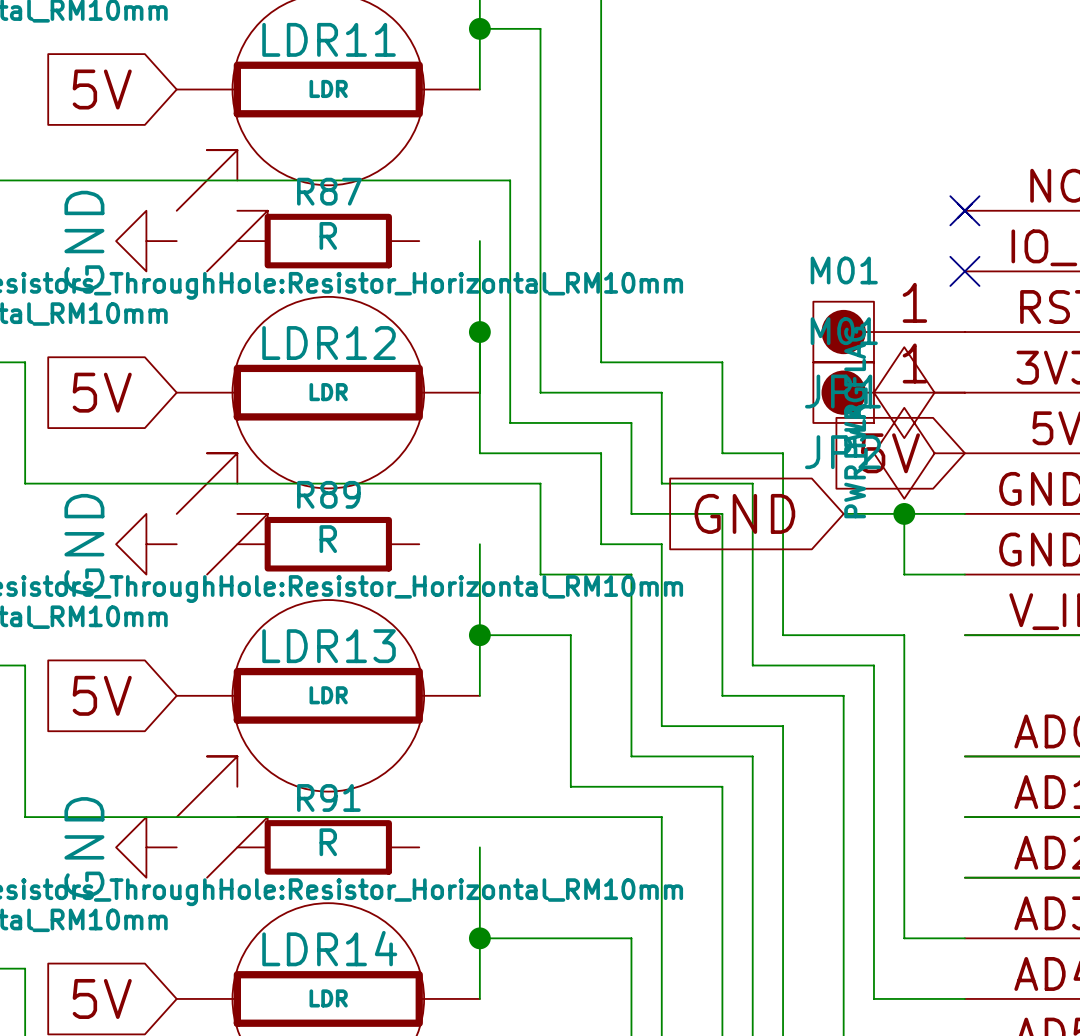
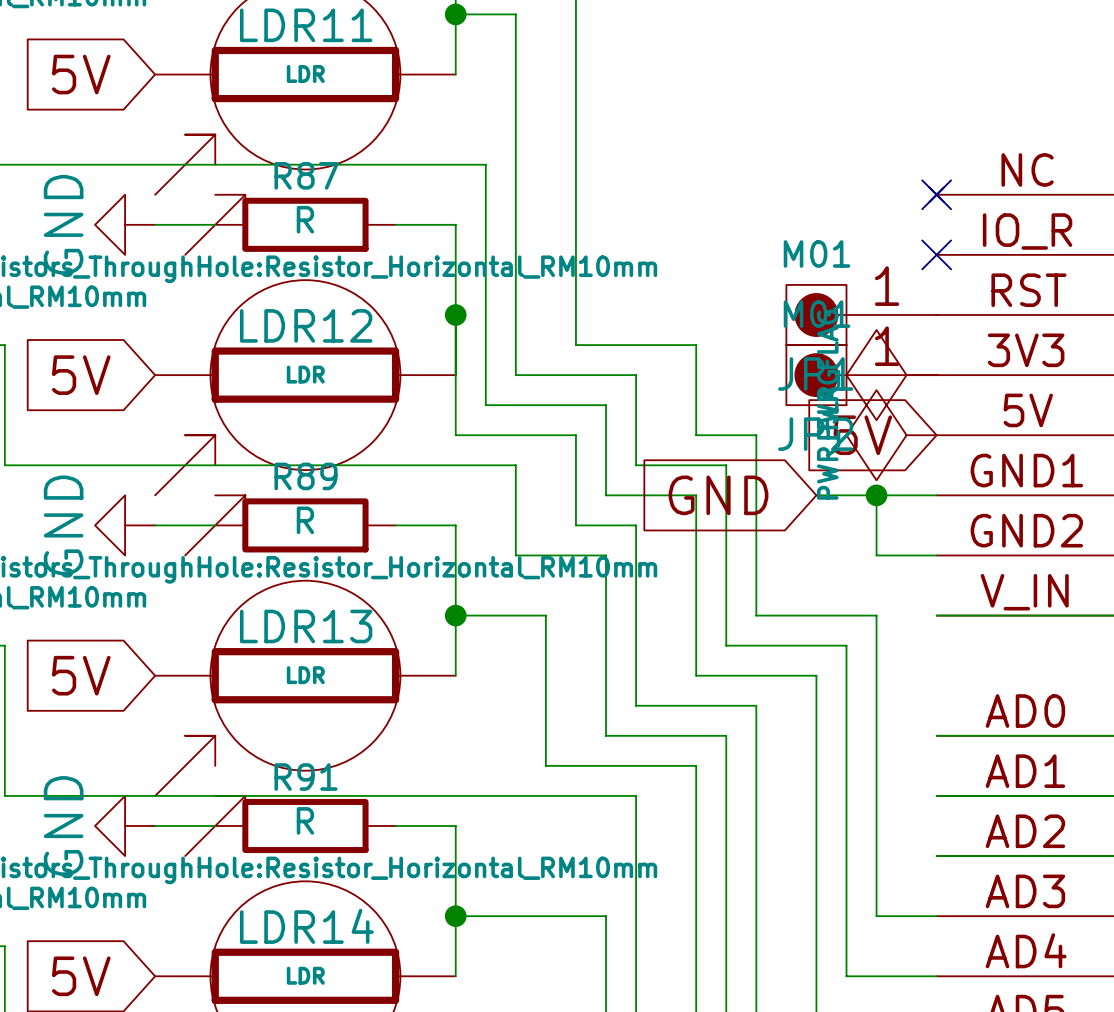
wire: none -> (155, 224) (215, 224)
wire: none -> (395, 224) (455, 224)
wire: none -> (155, 525) (215, 525)
wire: none -> (395, 525) (455, 525)
wire: none -> (155, 826) (215, 826)
wire: none -> (395, 826) (455, 826)

